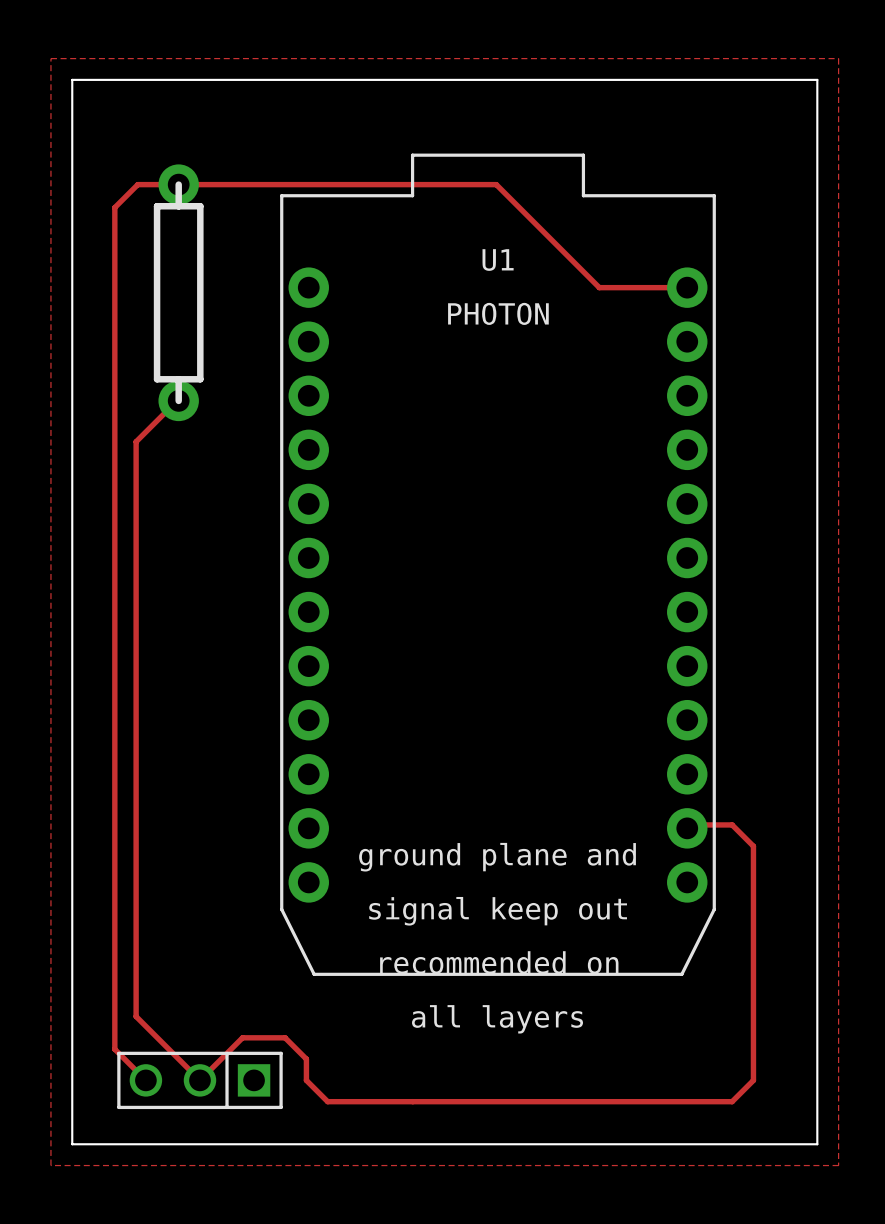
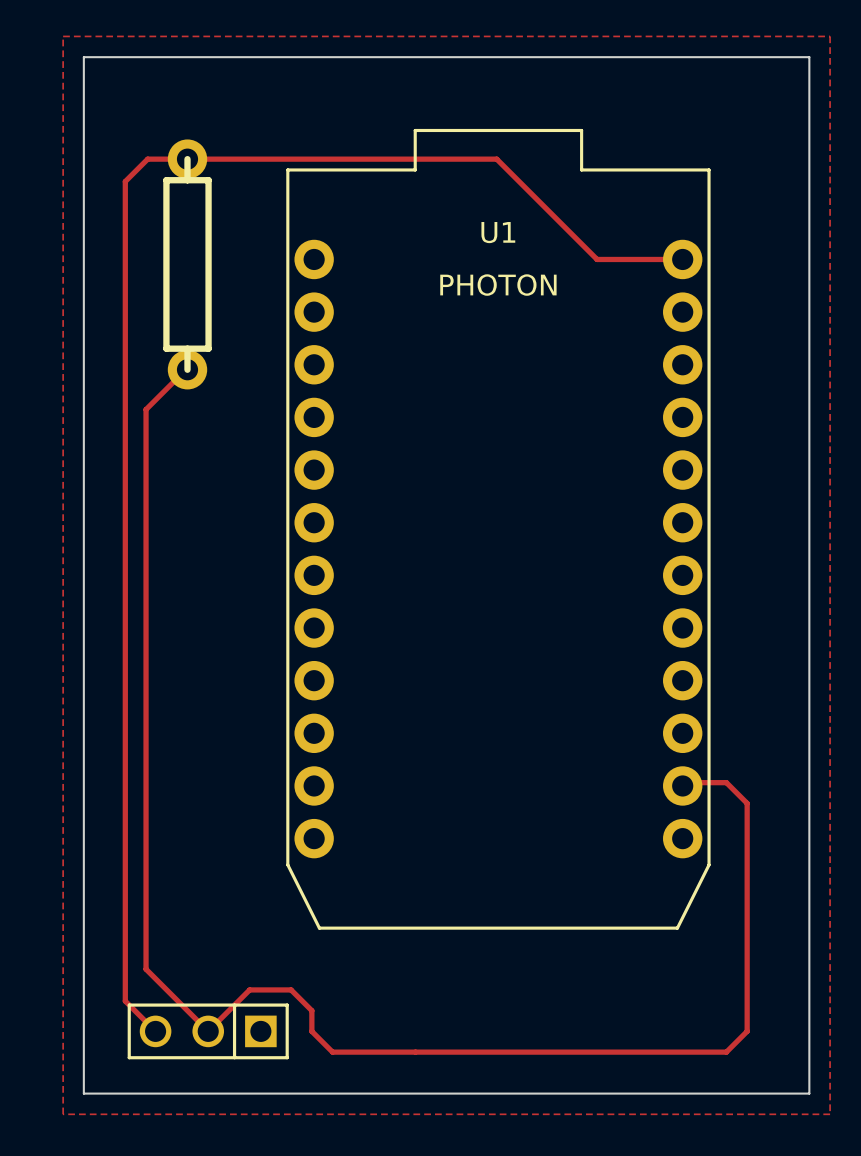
U1 text: ground plane and (497, 857) -> none
U1 text: signal keep out (498, 911) -> none
U1 text: recommended on (499, 962) -> none
U1 text: all layers (497, 1019) -> none

